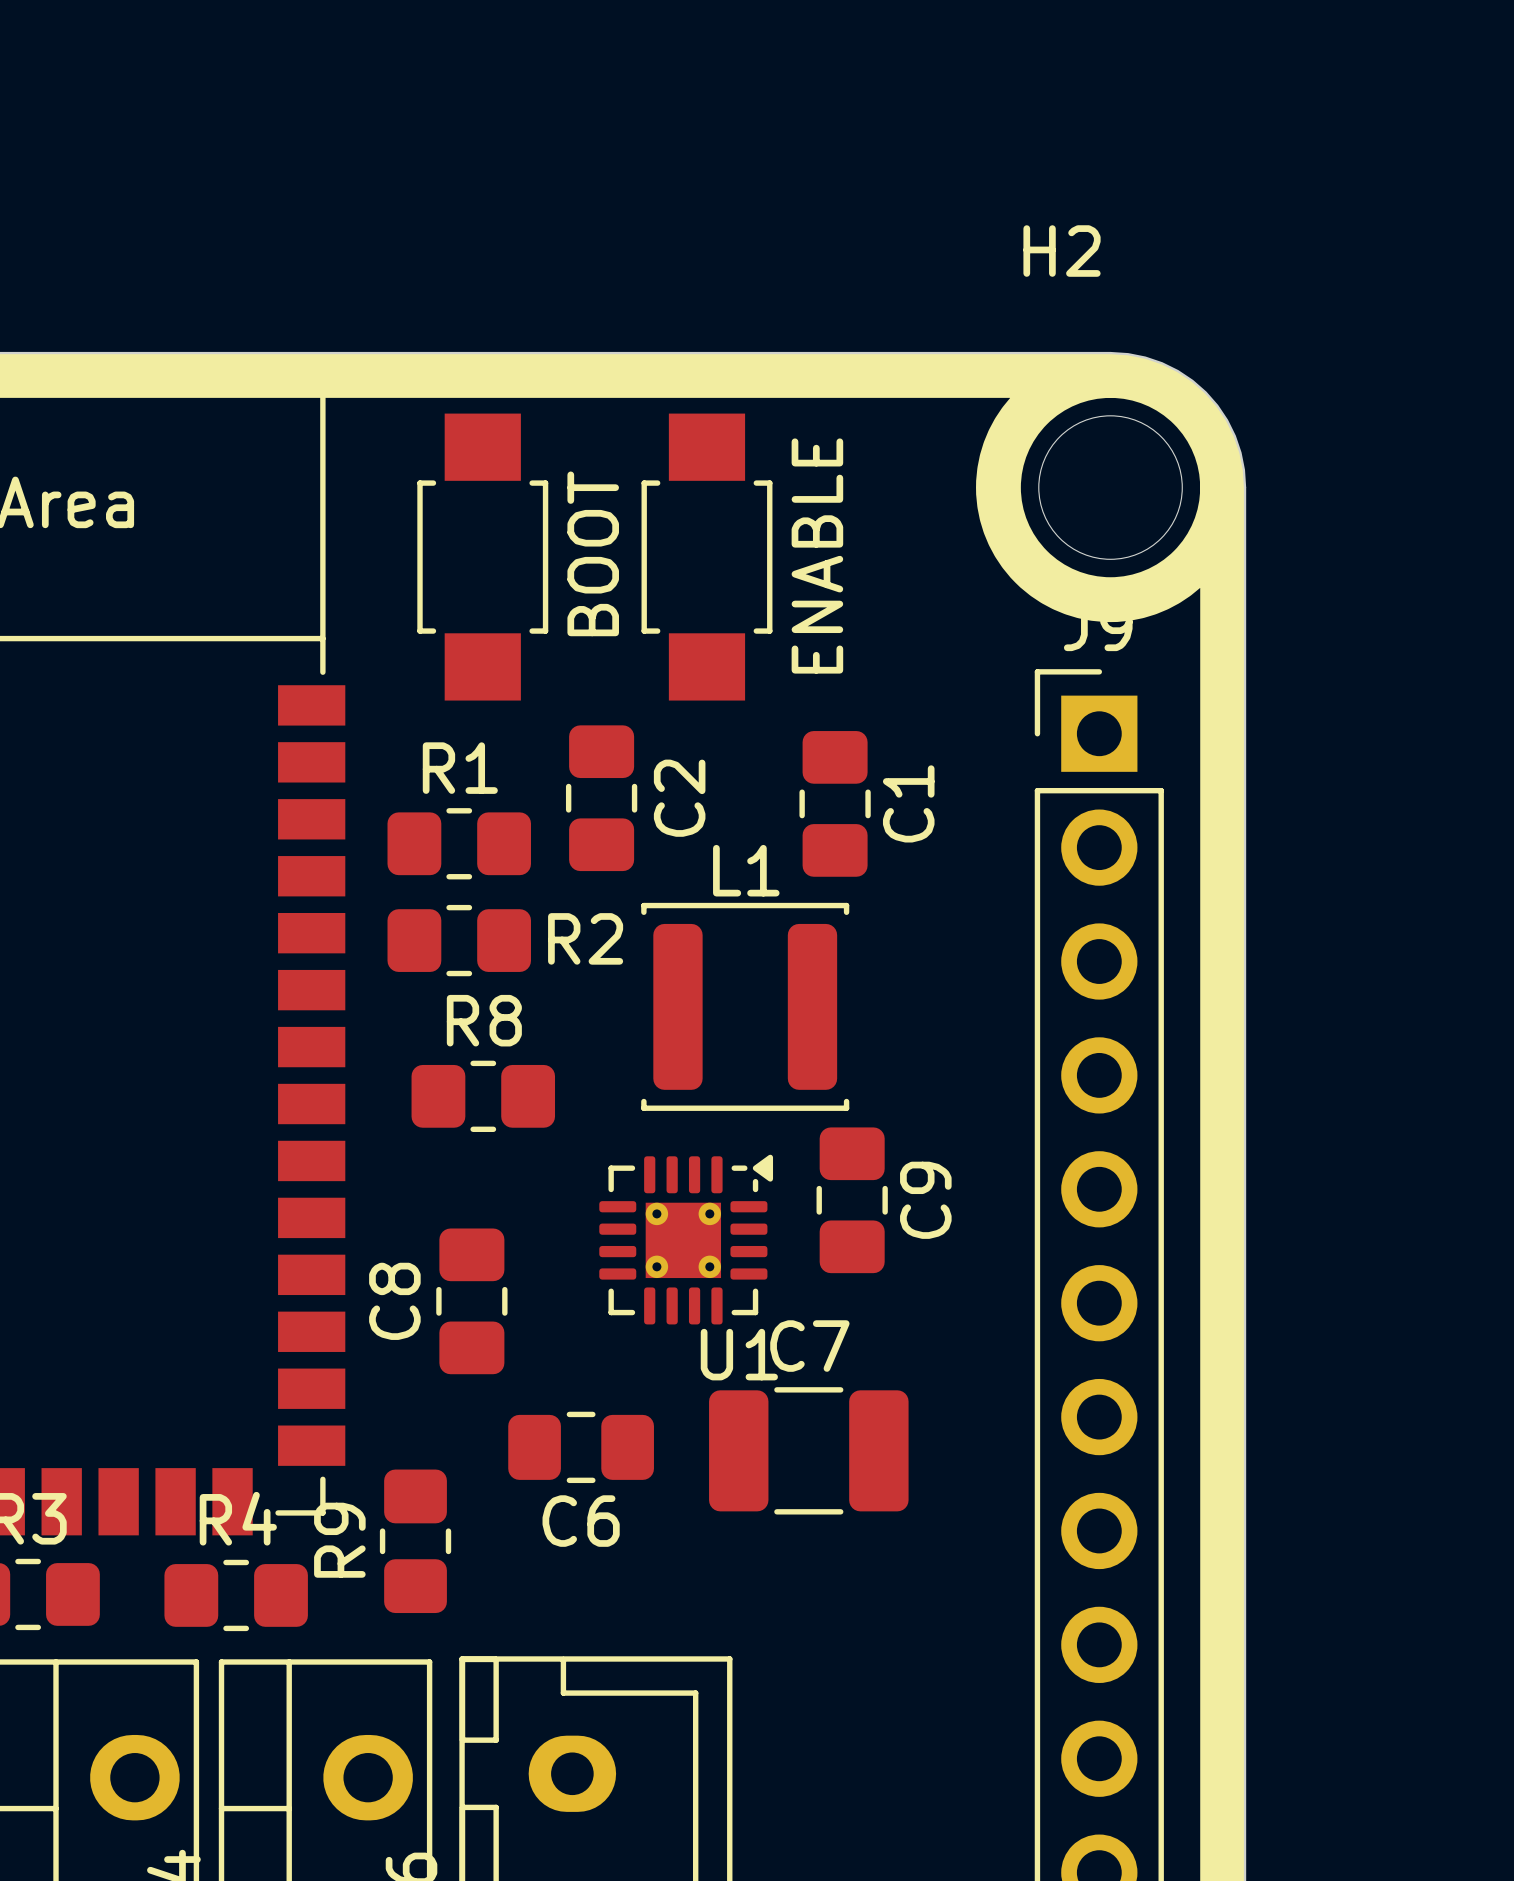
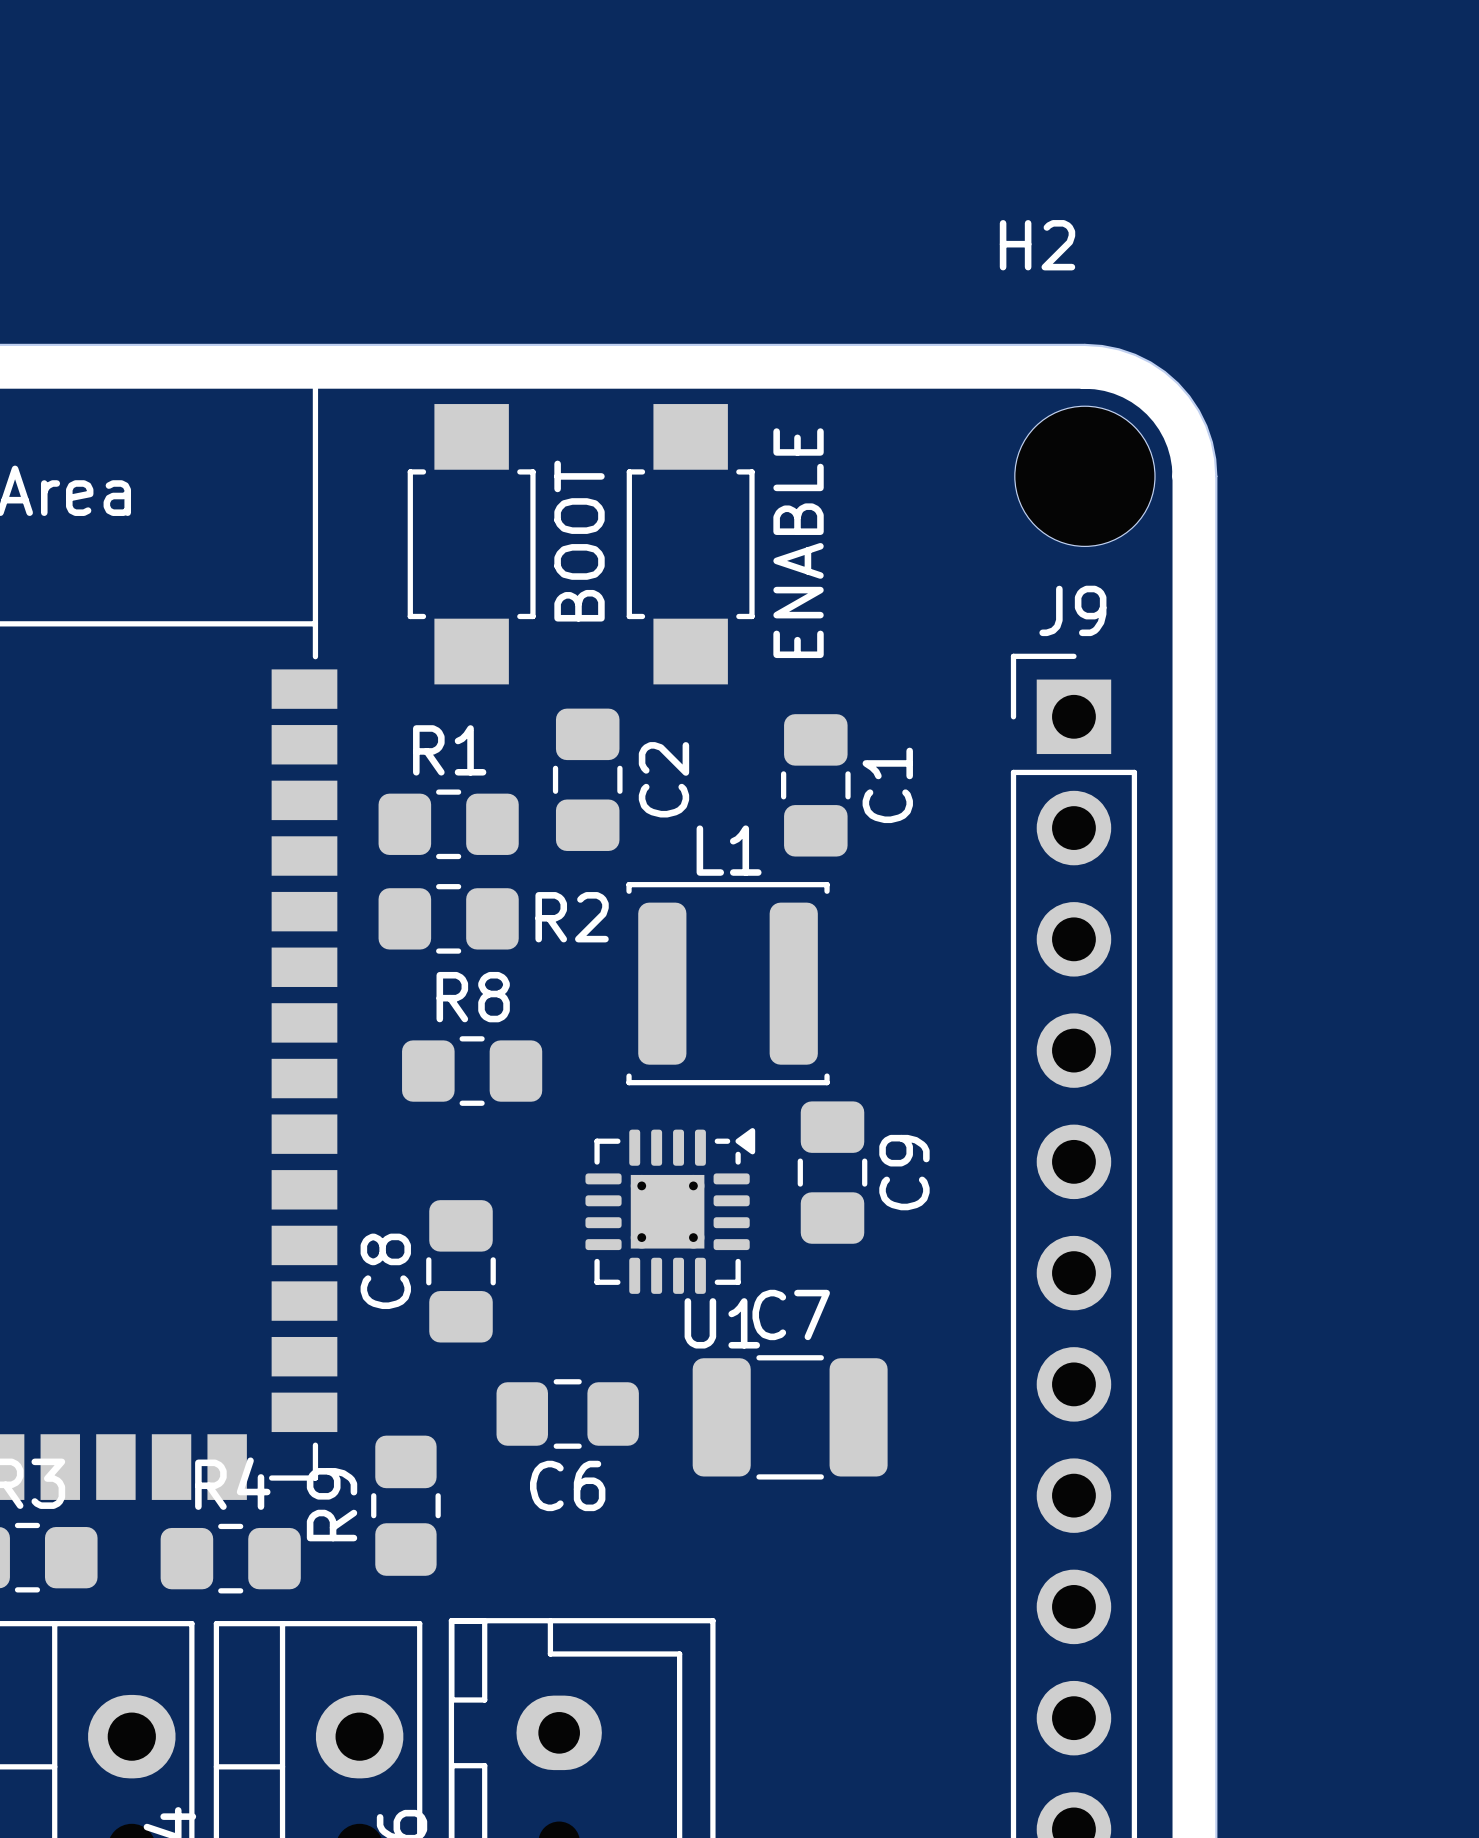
drawing: [976, 353, 1246, 623] -> none
line: none -> (1084, 366) (1109, 369) (1132, 377) (1162, 398) (1183, 428) (1191, 451) (1194, 476)

